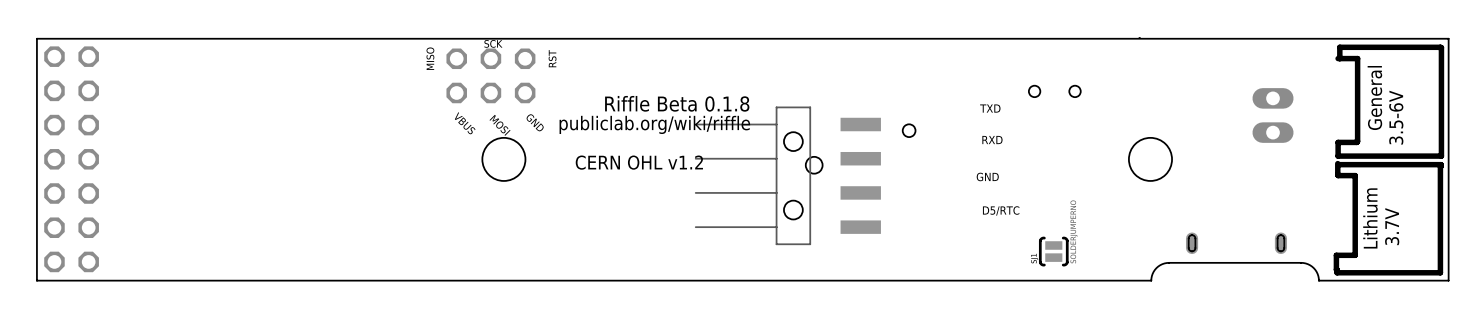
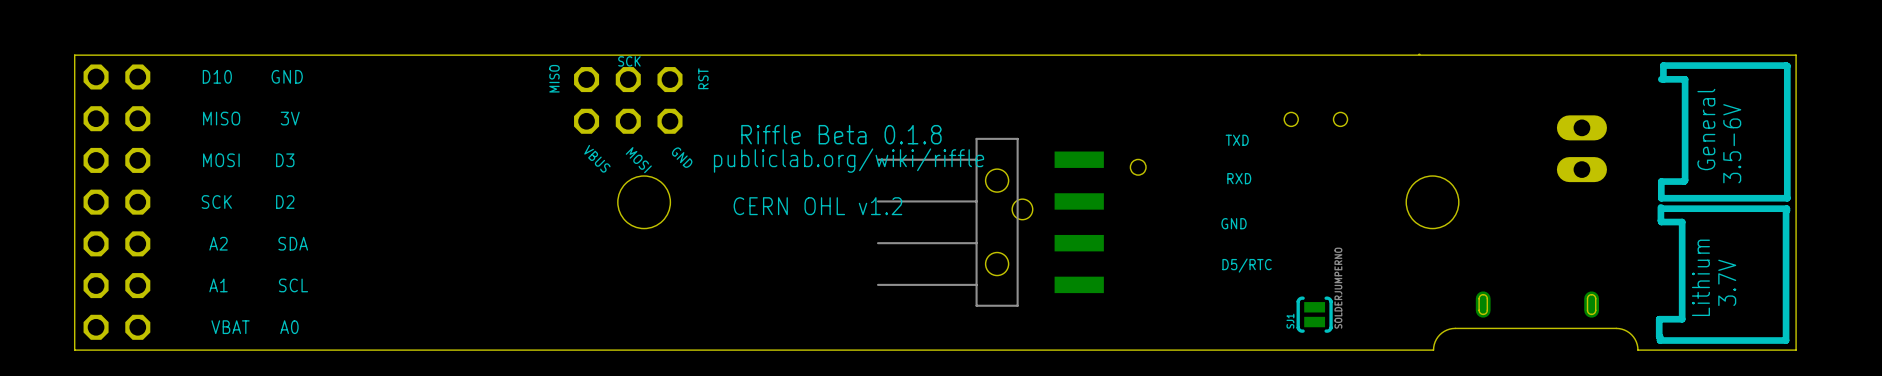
text: none -> D10 (217, 76)
text: none -> GND (287, 76)
text: none -> MISO (221, 118)
text: none -> 3V (290, 118)
text: none -> MOSI (221, 160)
text: none -> D3 (285, 160)
text: none -> SCK (216, 202)
text: none -> D2 (285, 202)
text: none -> A2 (218, 243)
text: none -> SDA (293, 243)
text: none -> A1 (218, 285)
text: none -> SCL (293, 285)
text: none -> VBAT (230, 327)
text: none -> A0 (289, 327)

